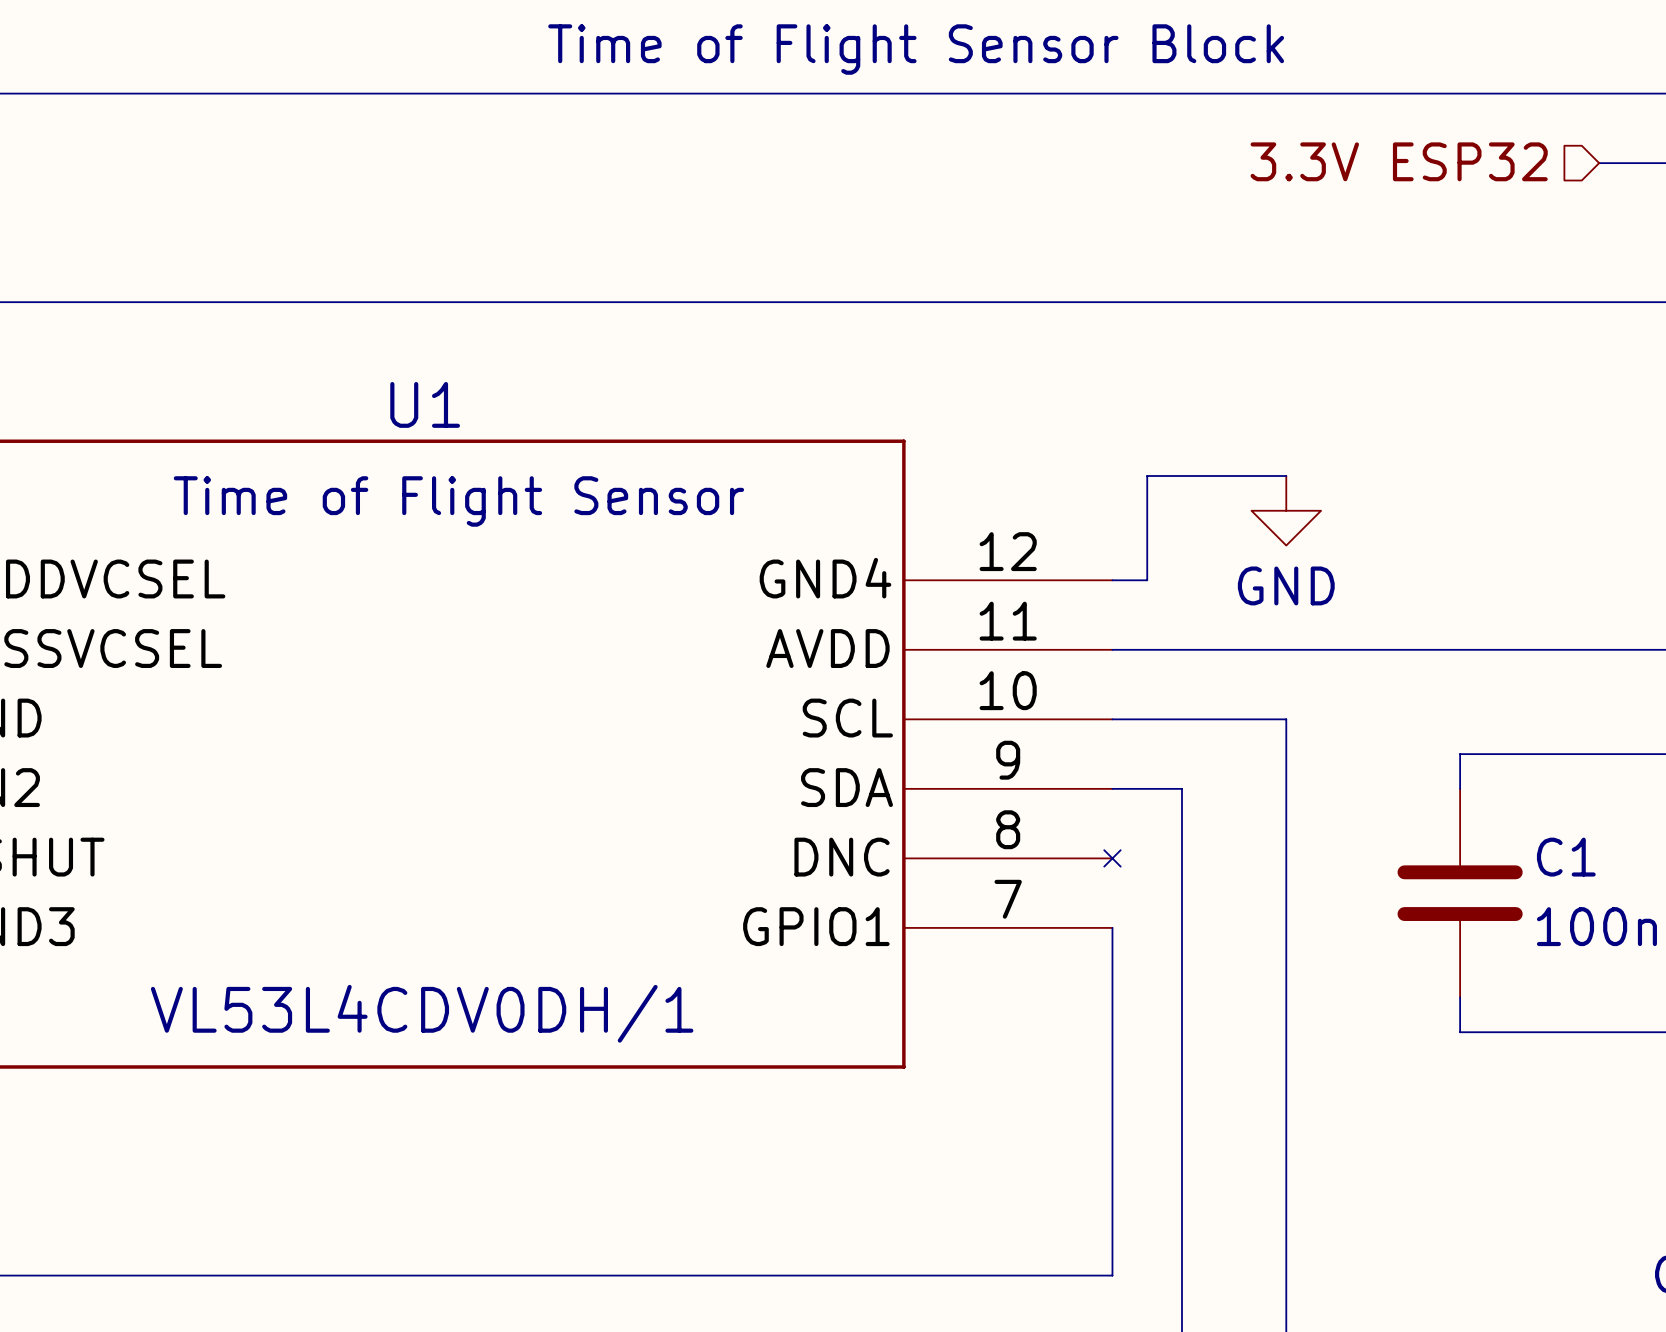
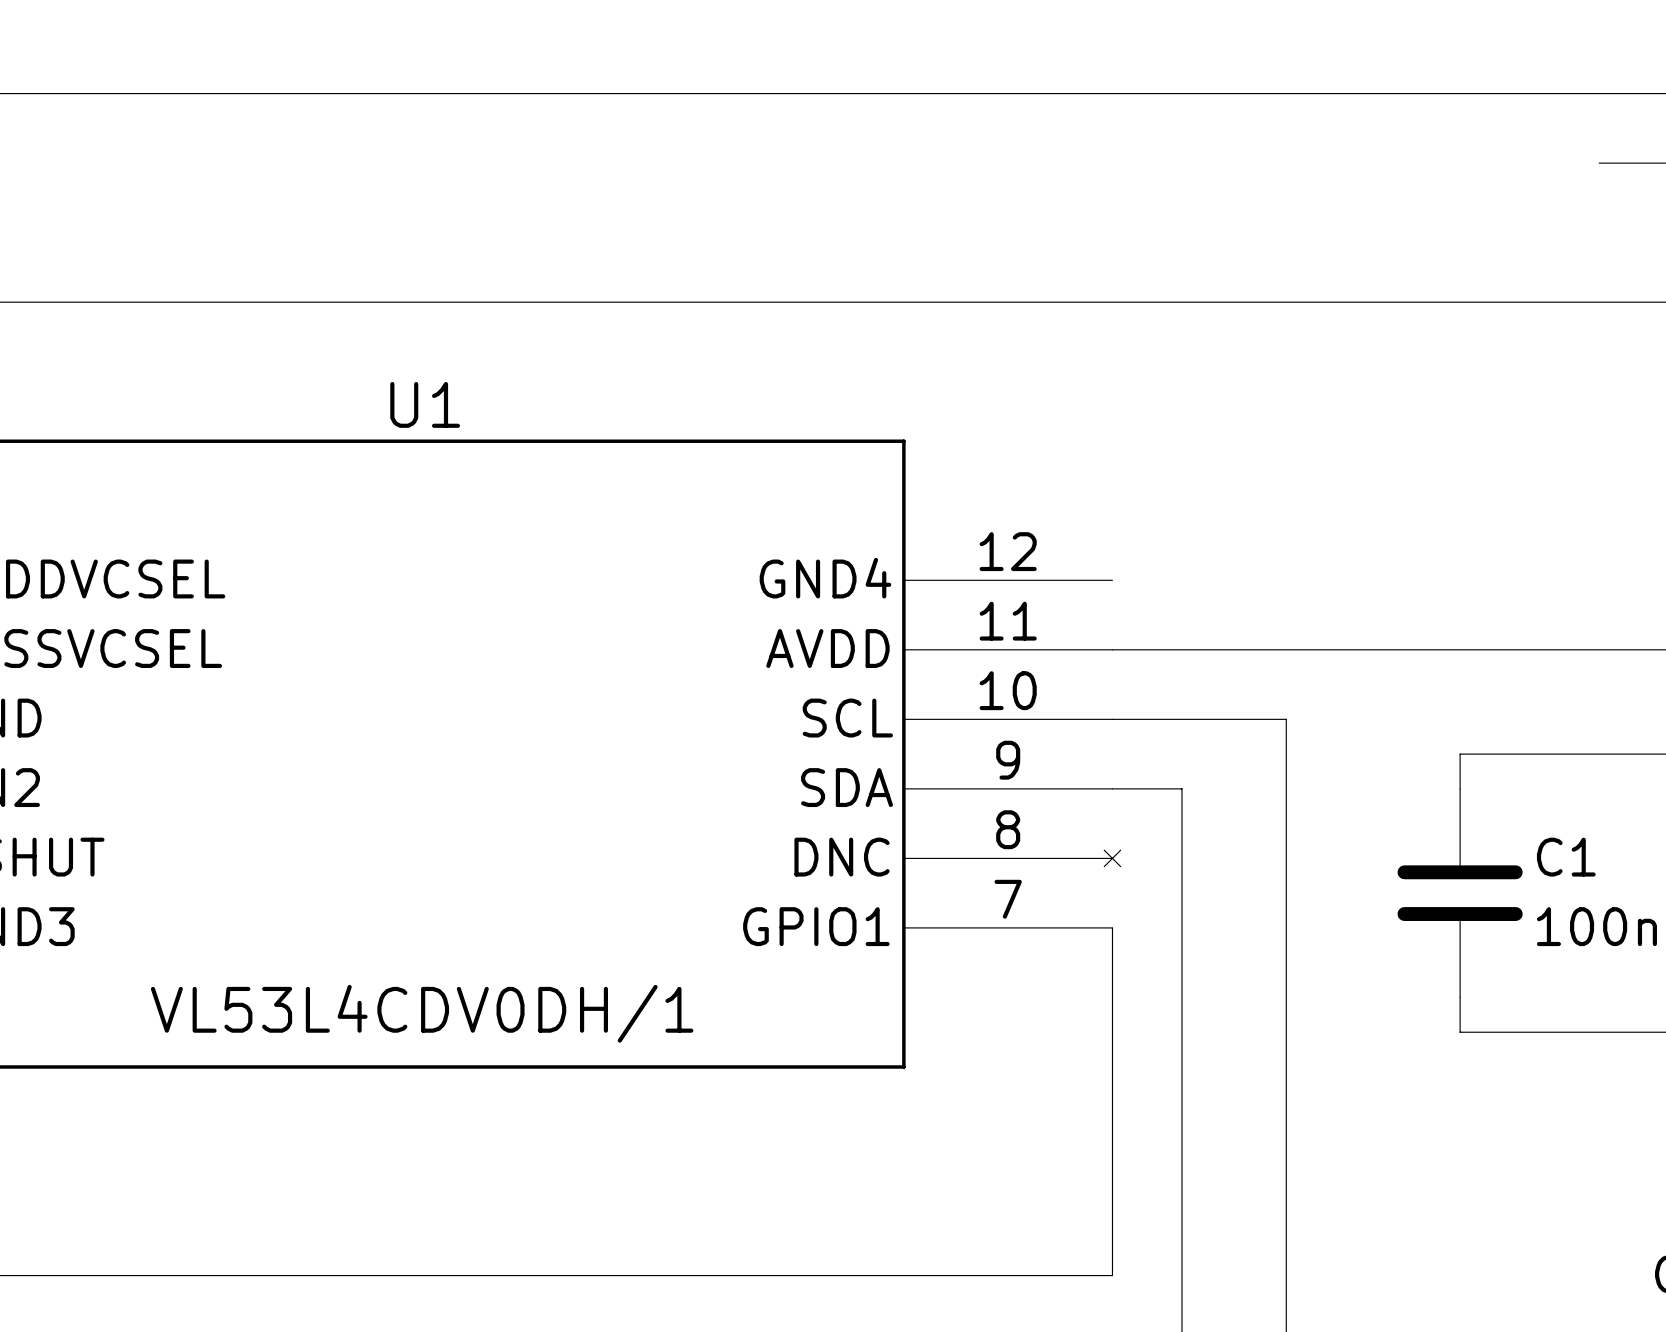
text: Time of Flight Sensor Block (916, 49) -> none
hierarchical label: 3.3V ESP32 (1399, 161) -> none
wire: (1286, 476) (1147, 476) (1147, 580) (1112, 580) -> none
text: Time of Flight Sensor (458, 501) -> none
power symbol: GND (1286, 510) -> none

